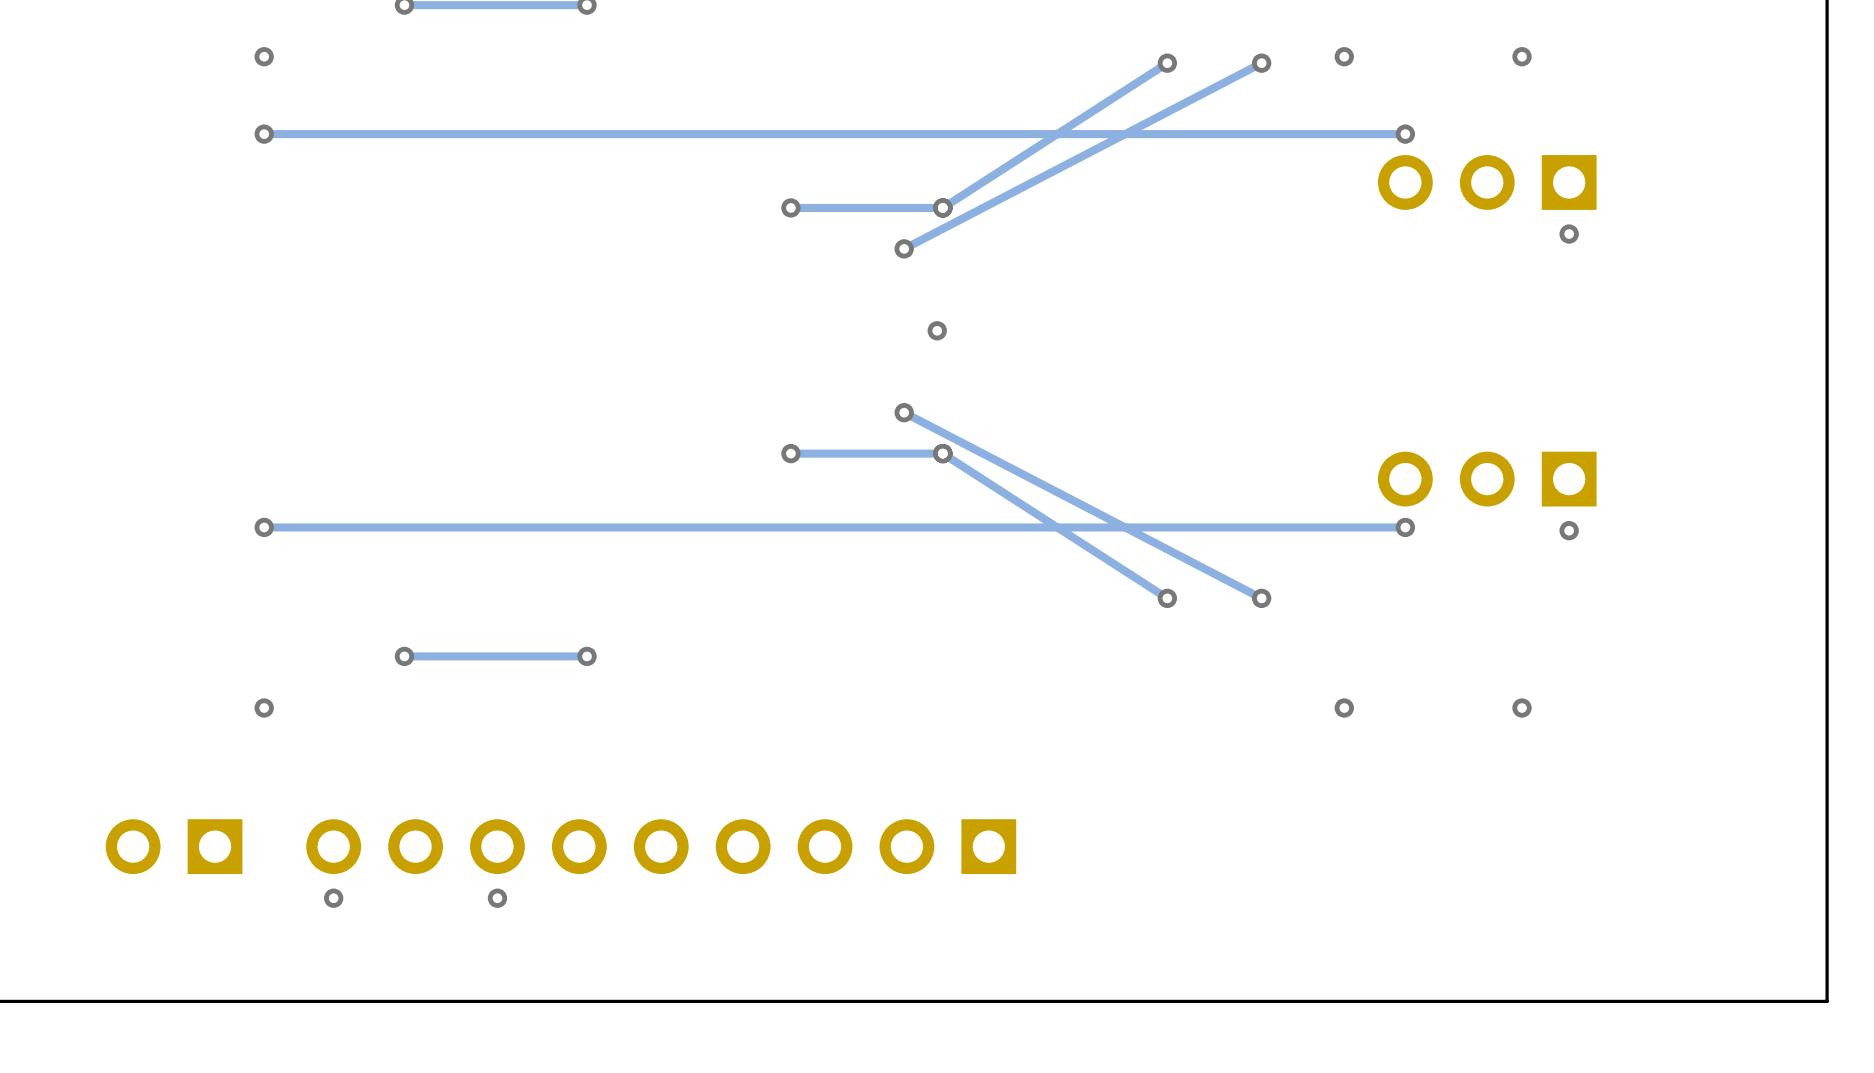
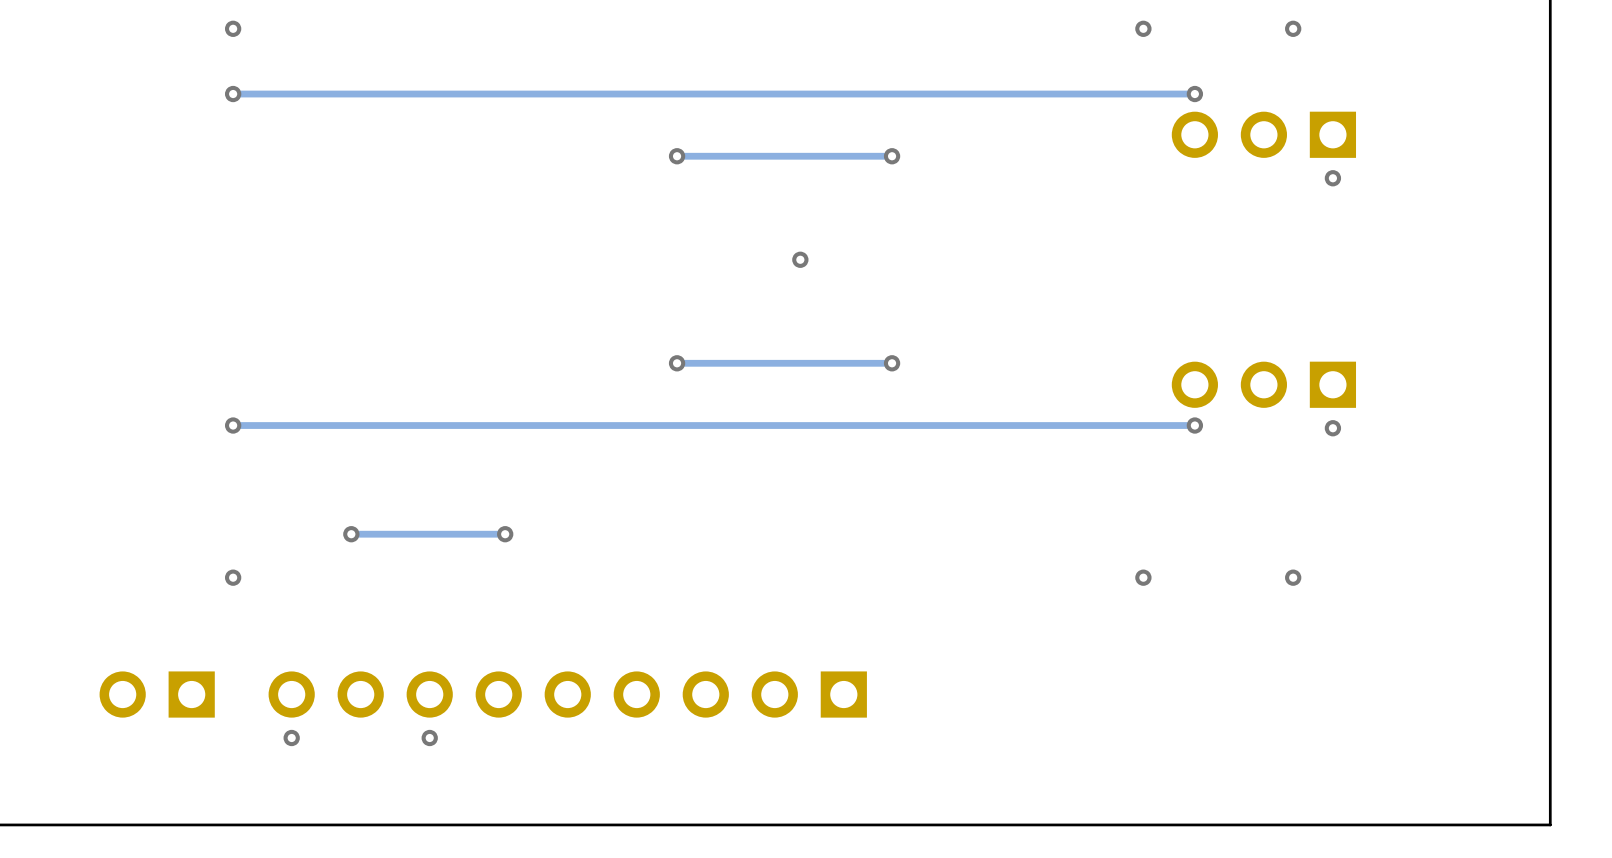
track: (1167, 63) (942, 207) -> (892, 156) (805, 156)
via: (1167, 63) -> none
track: (1261, 63) (904, 248) -> none
via: (1261, 63) -> none
via: (942, 207) -> none
via: none -> (892, 156)
via: (904, 248) -> none
track: (904, 412) (1261, 598) -> none
via: (904, 412) -> none
track: (942, 453) (1167, 598) -> (805, 363) (892, 363)
via: (942, 453) -> none
via: none -> (892, 363)
via: (1167, 598) -> none
via: (1261, 598) -> none

